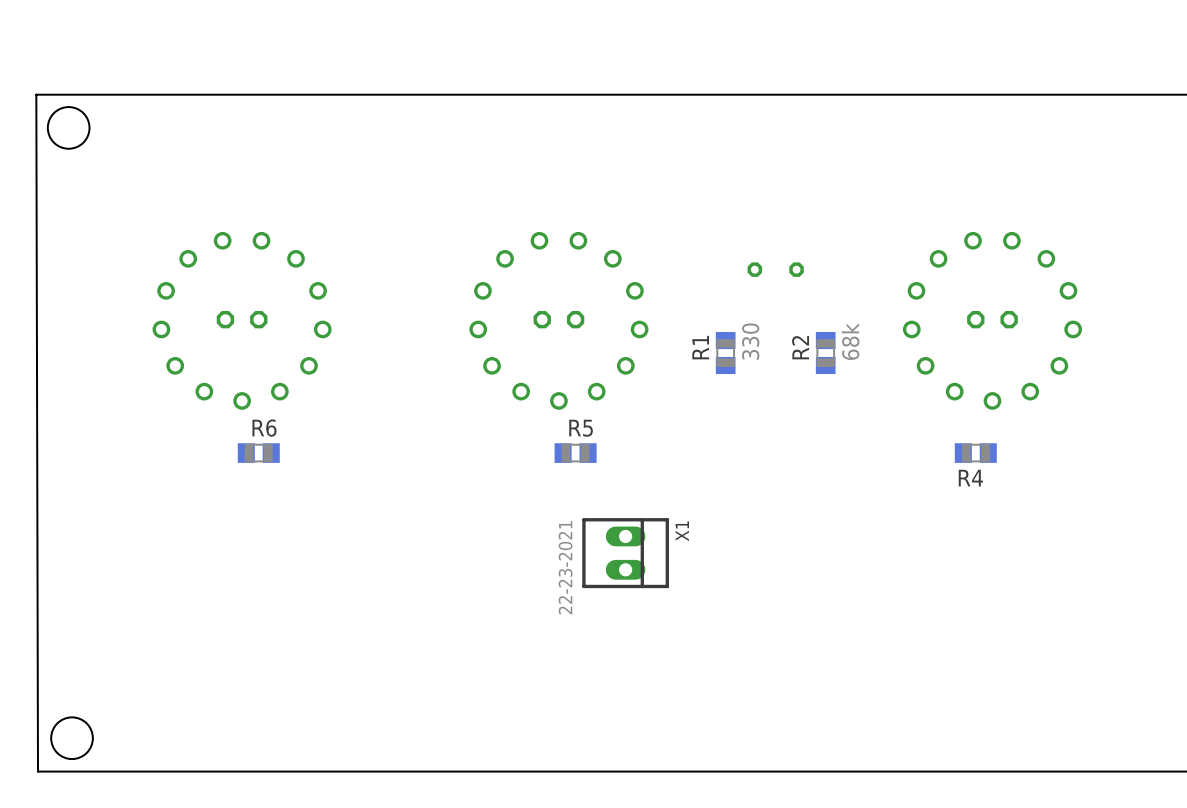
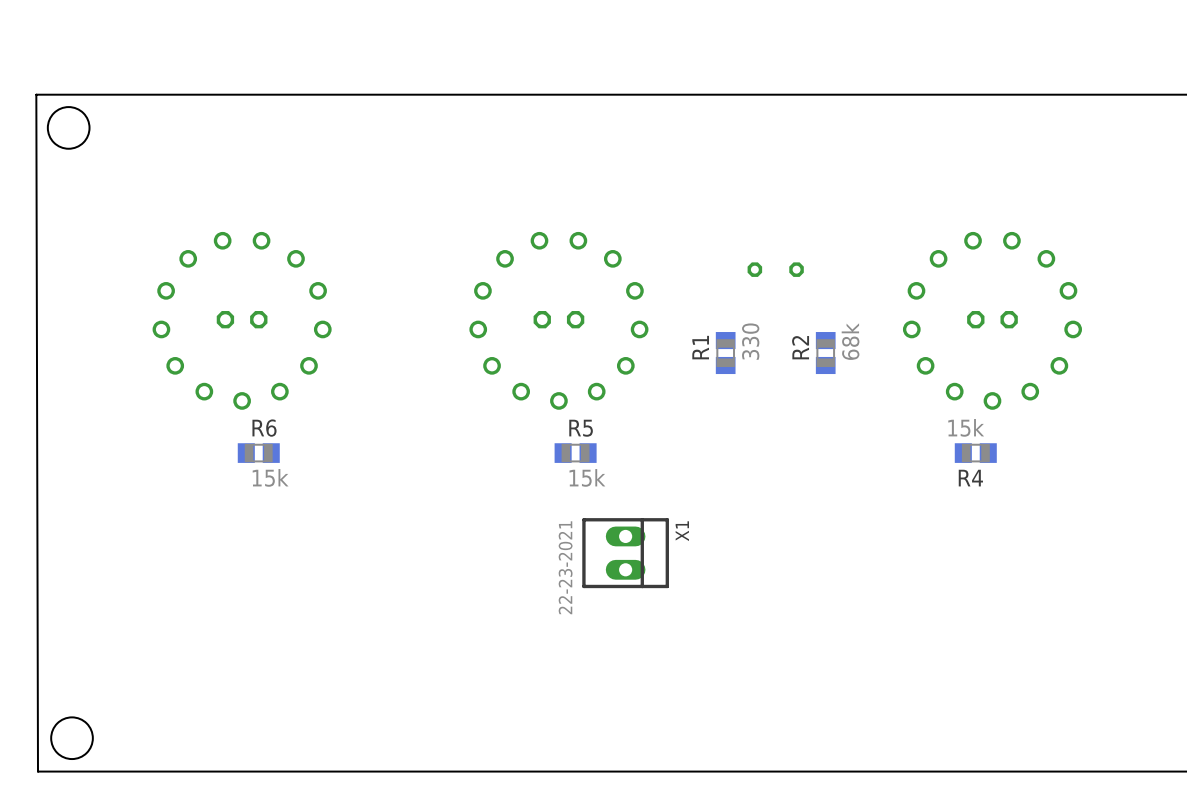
R4 value: none -> 15k (966, 427)
R6 value: none -> 15k (270, 477)
R5 value: none -> 15k (587, 477)

